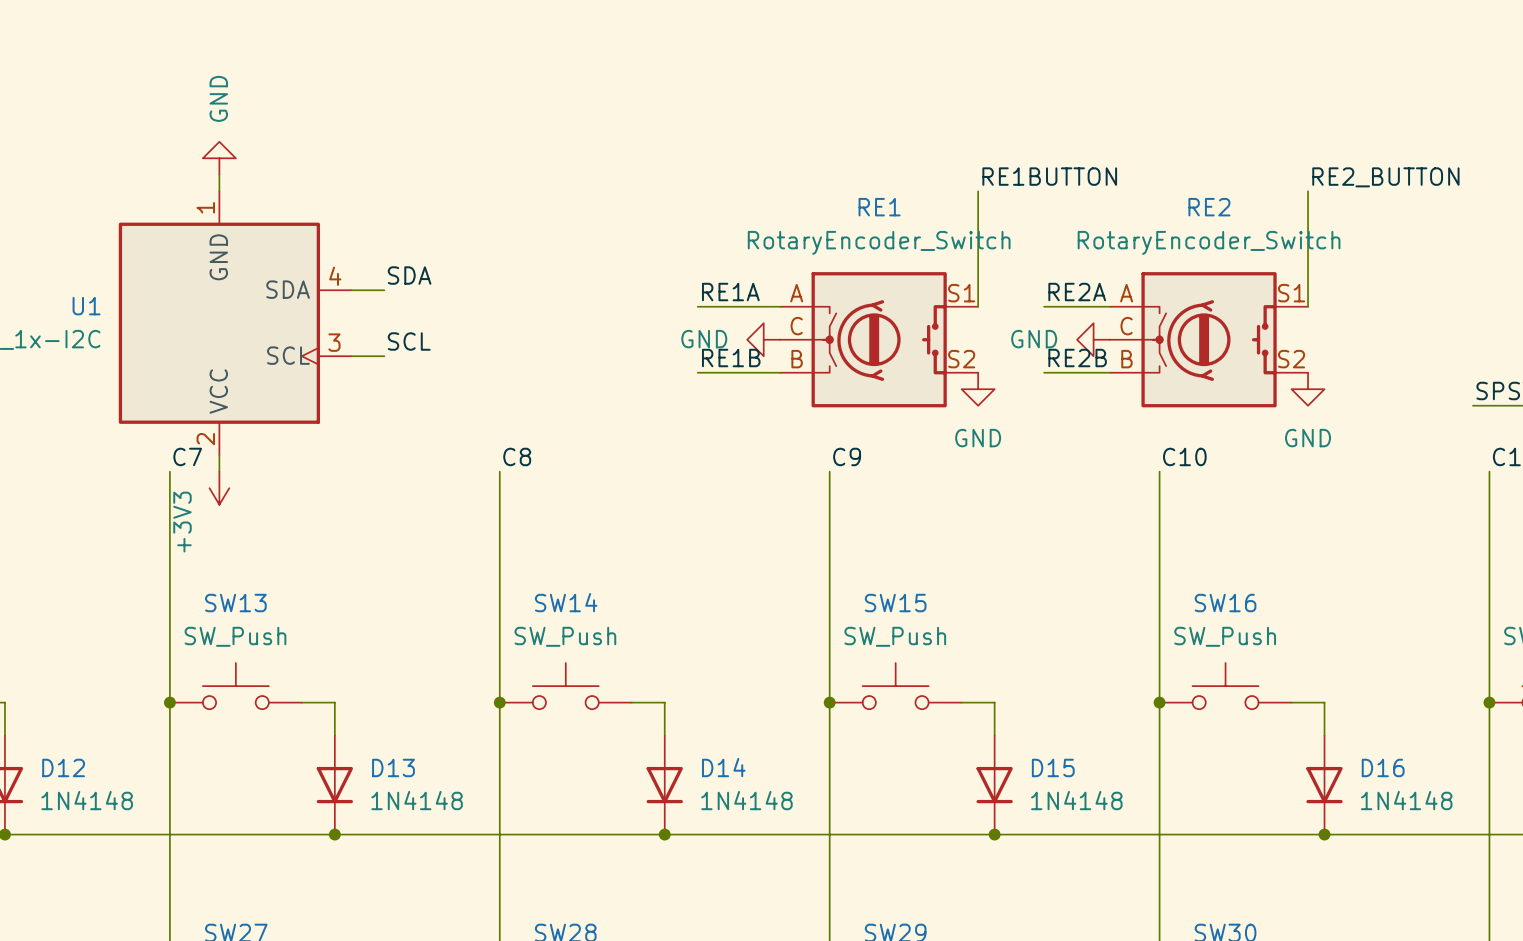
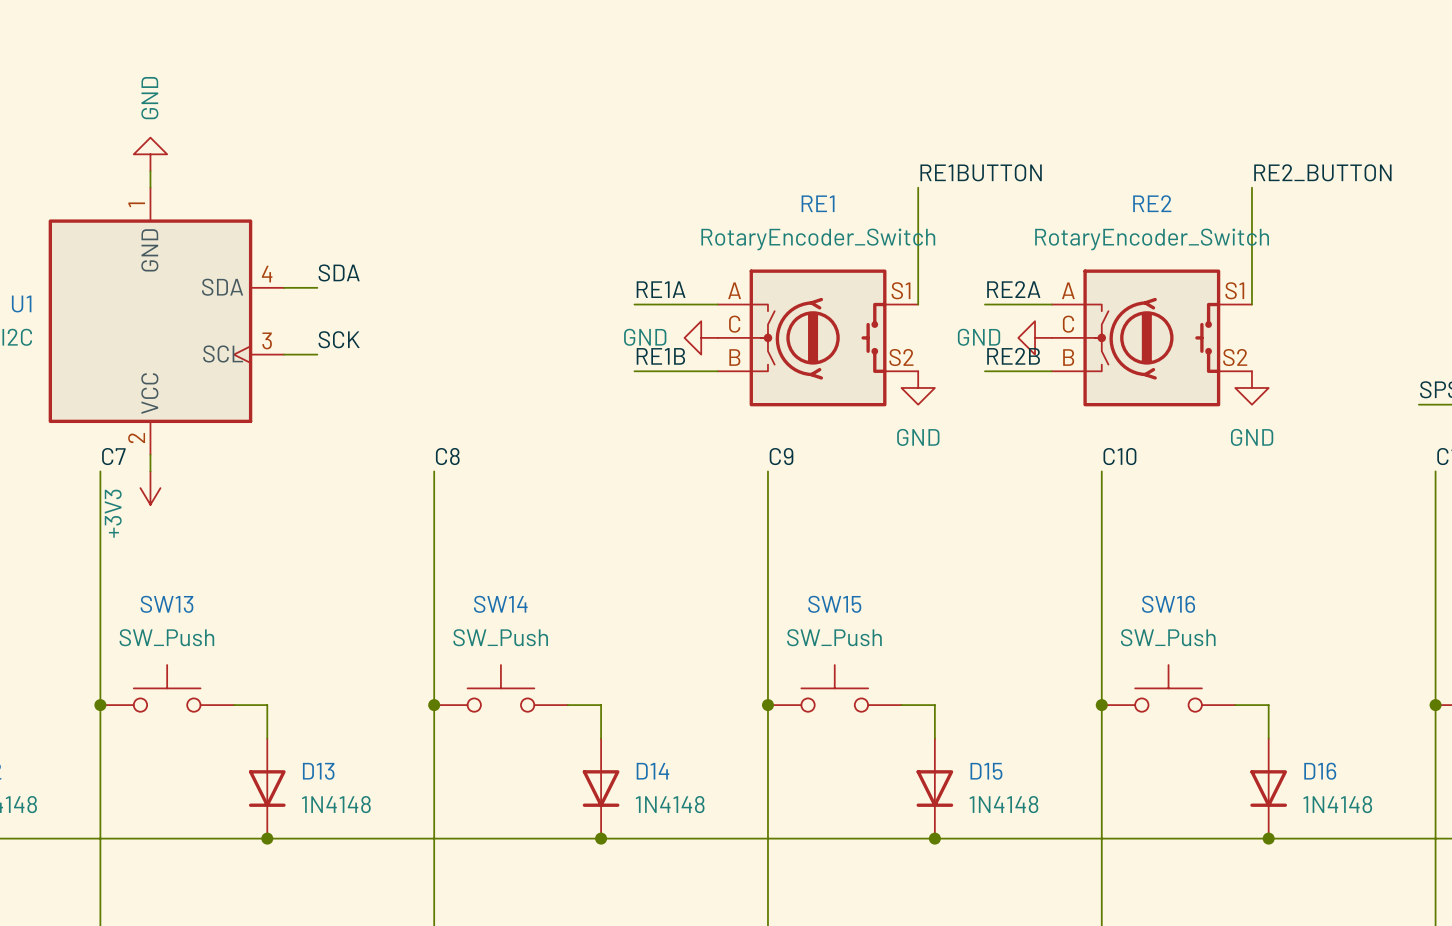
label: SCL (409, 341) -> SCK (339, 339)

